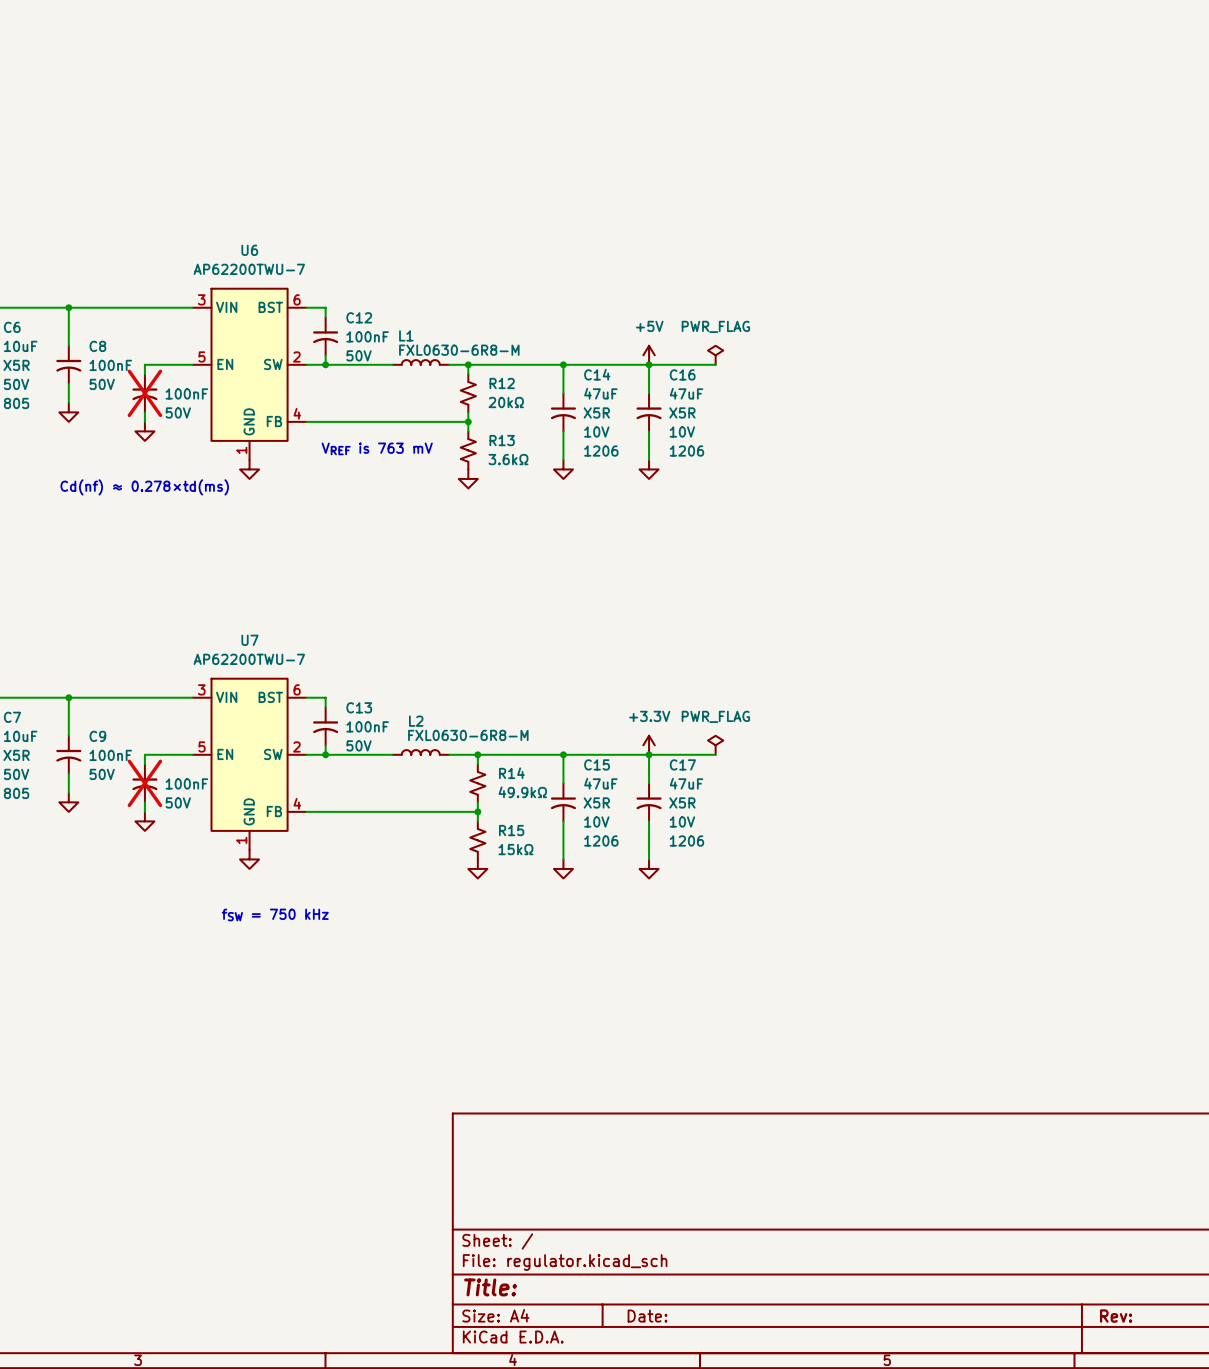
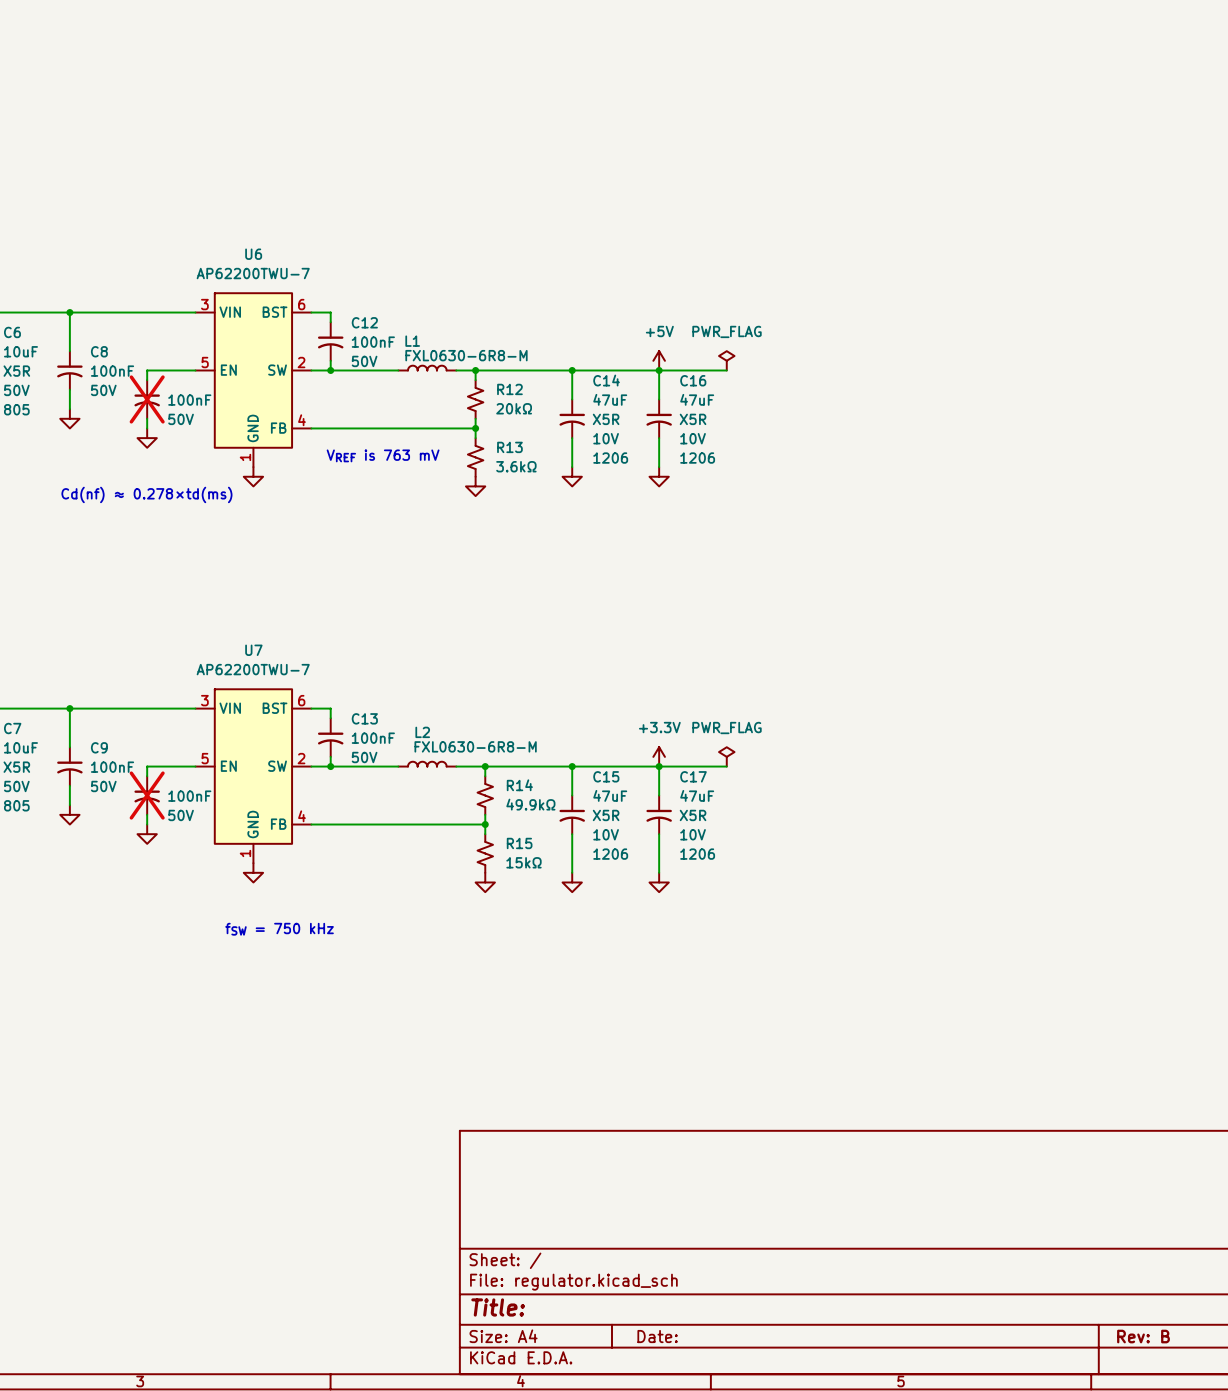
title block: Rev: (1116, 1316) -> Rev: B (1143, 1336)

